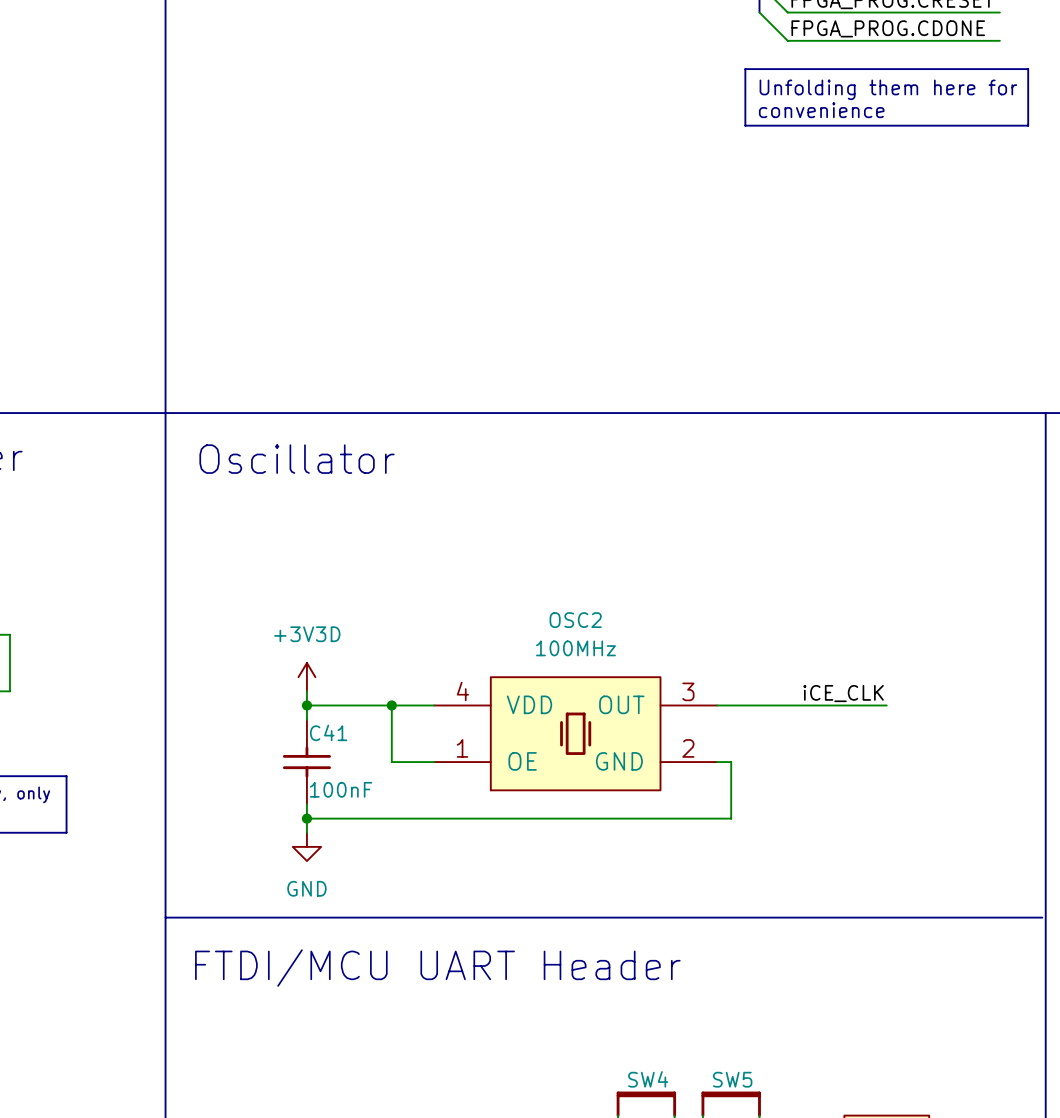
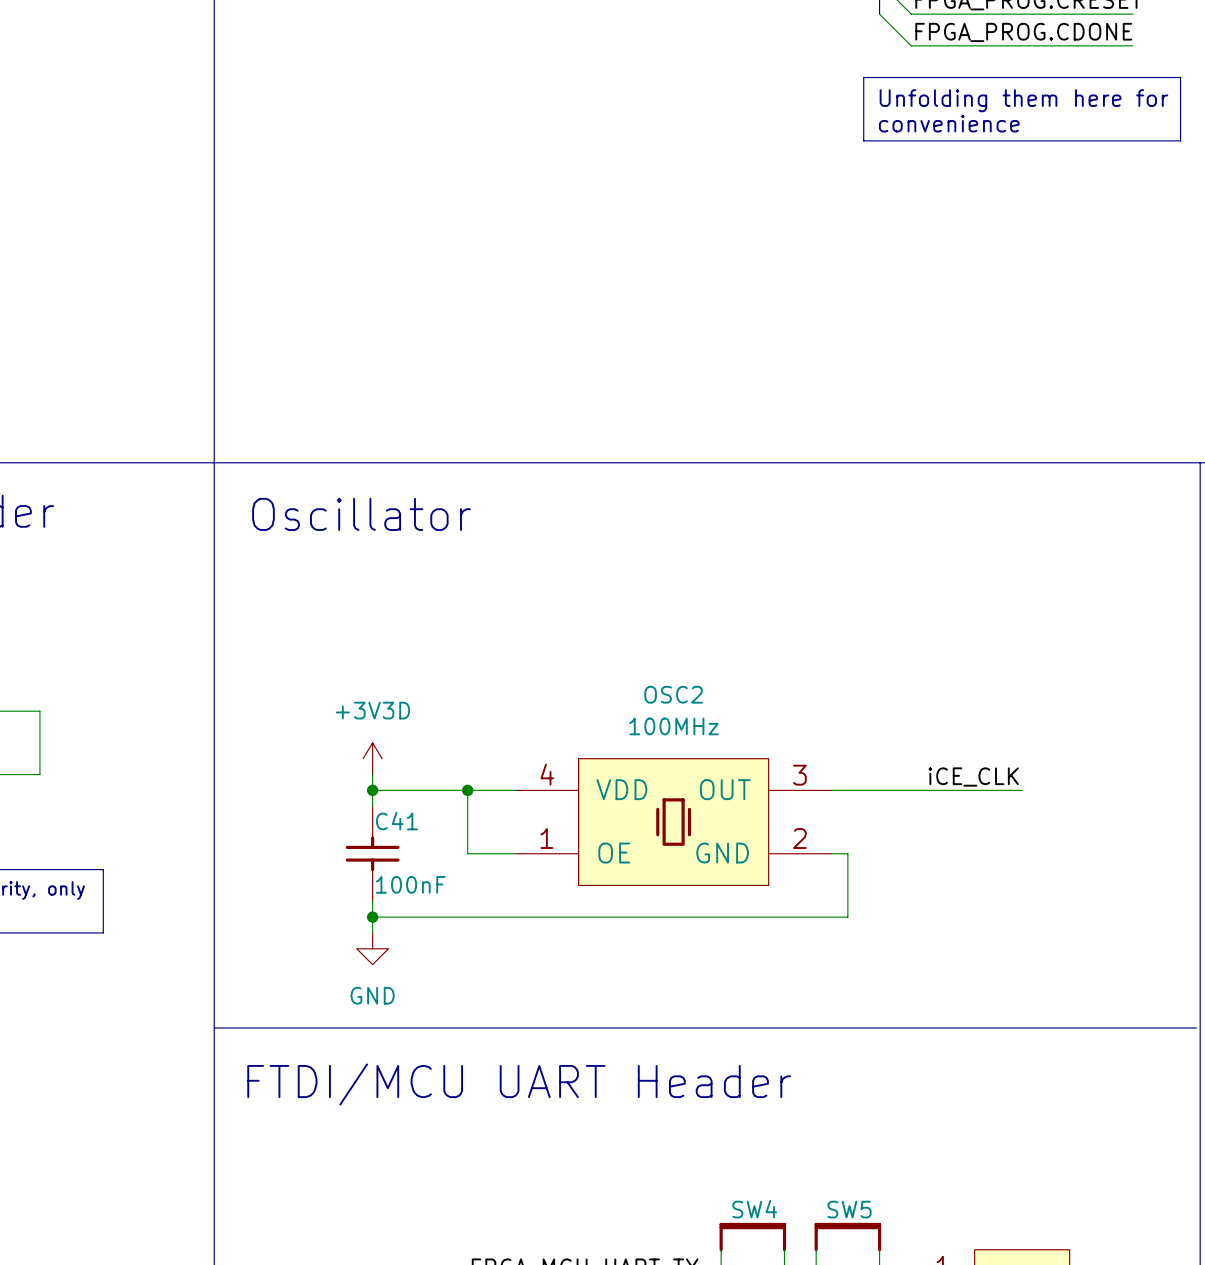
wire: (985, 12) (999, 12) -> none
wire: (985, 40) (999, 40) -> none

